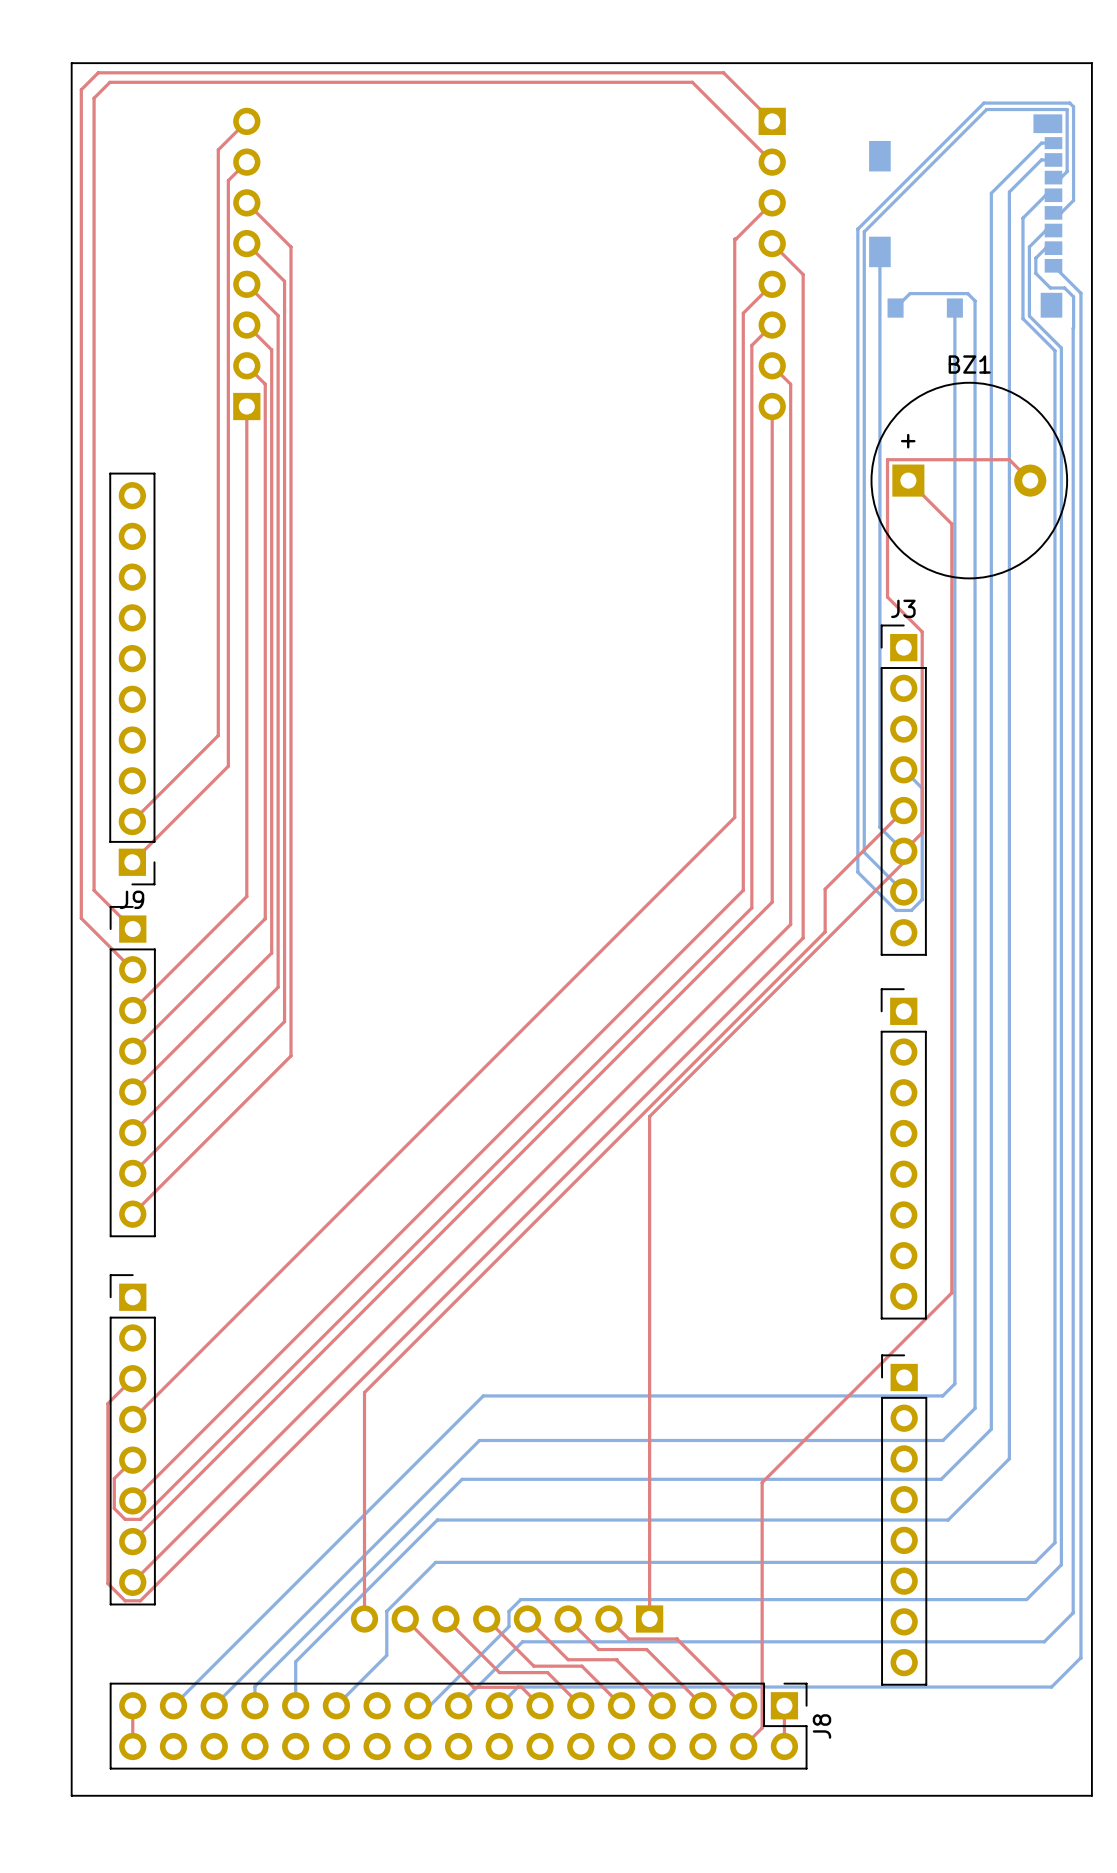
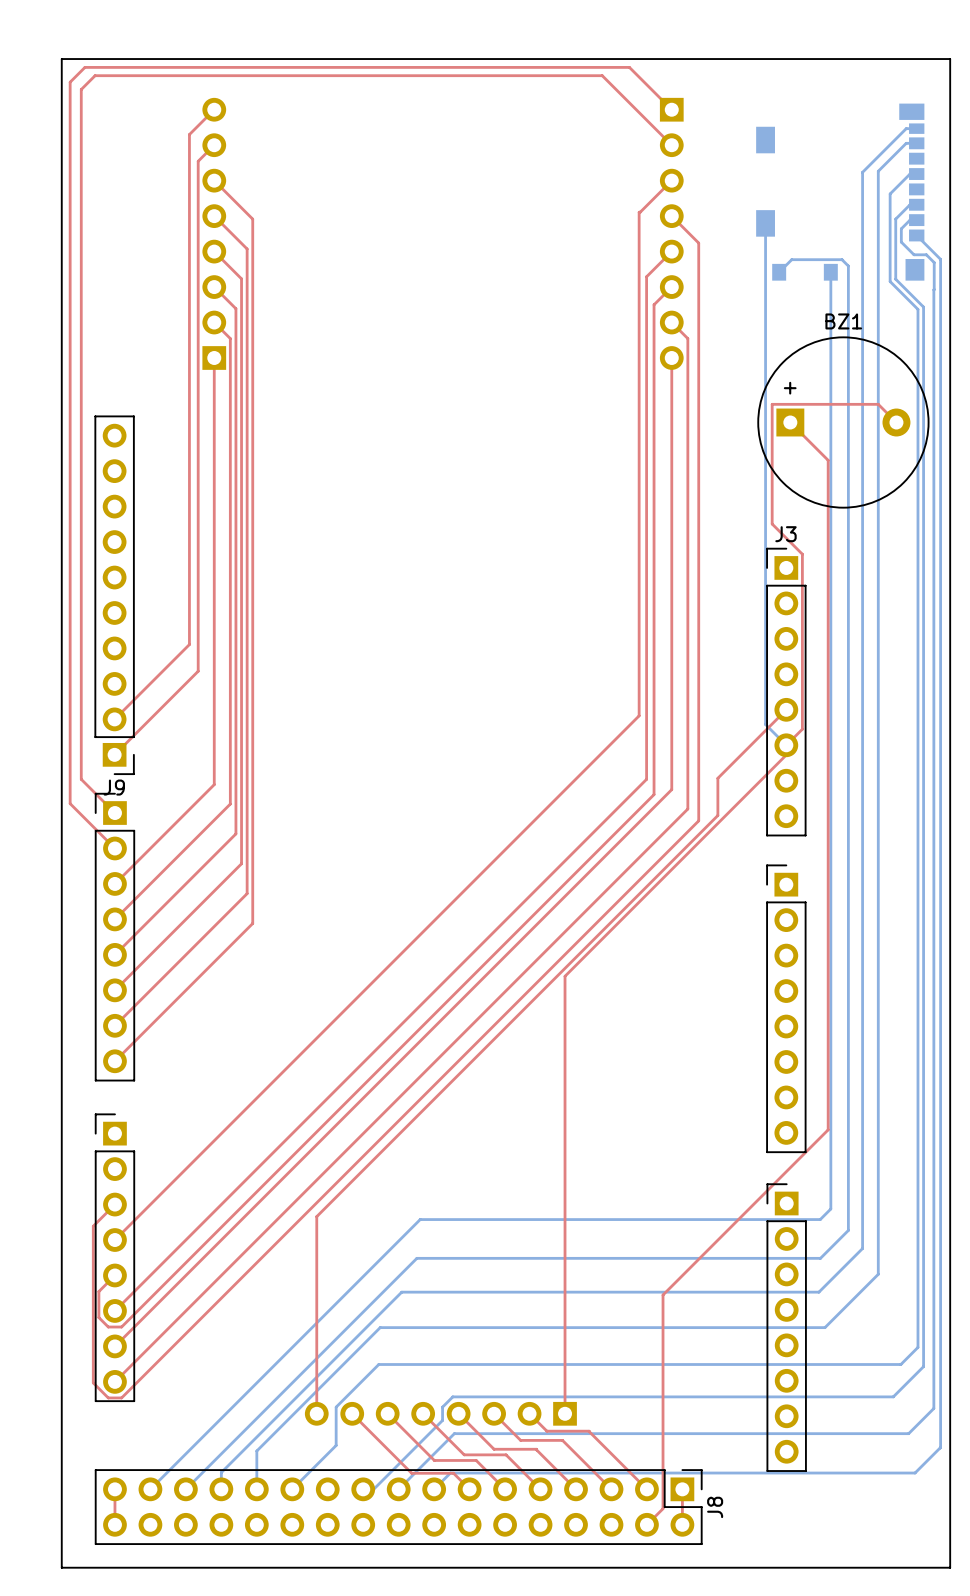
bottom track: (1053, 177) (1061, 177) (1067, 171) (1067, 109) (986, 109) (864, 231) (864, 852) (903, 891) -> none
bottom track: (1053, 212) (1061, 212) (1073, 200) (1073, 106) (1069, 103) (983, 103) (857, 229) (857, 872) (896, 910) (911, 910) (922, 899) (922, 788) (903, 769) -> none

